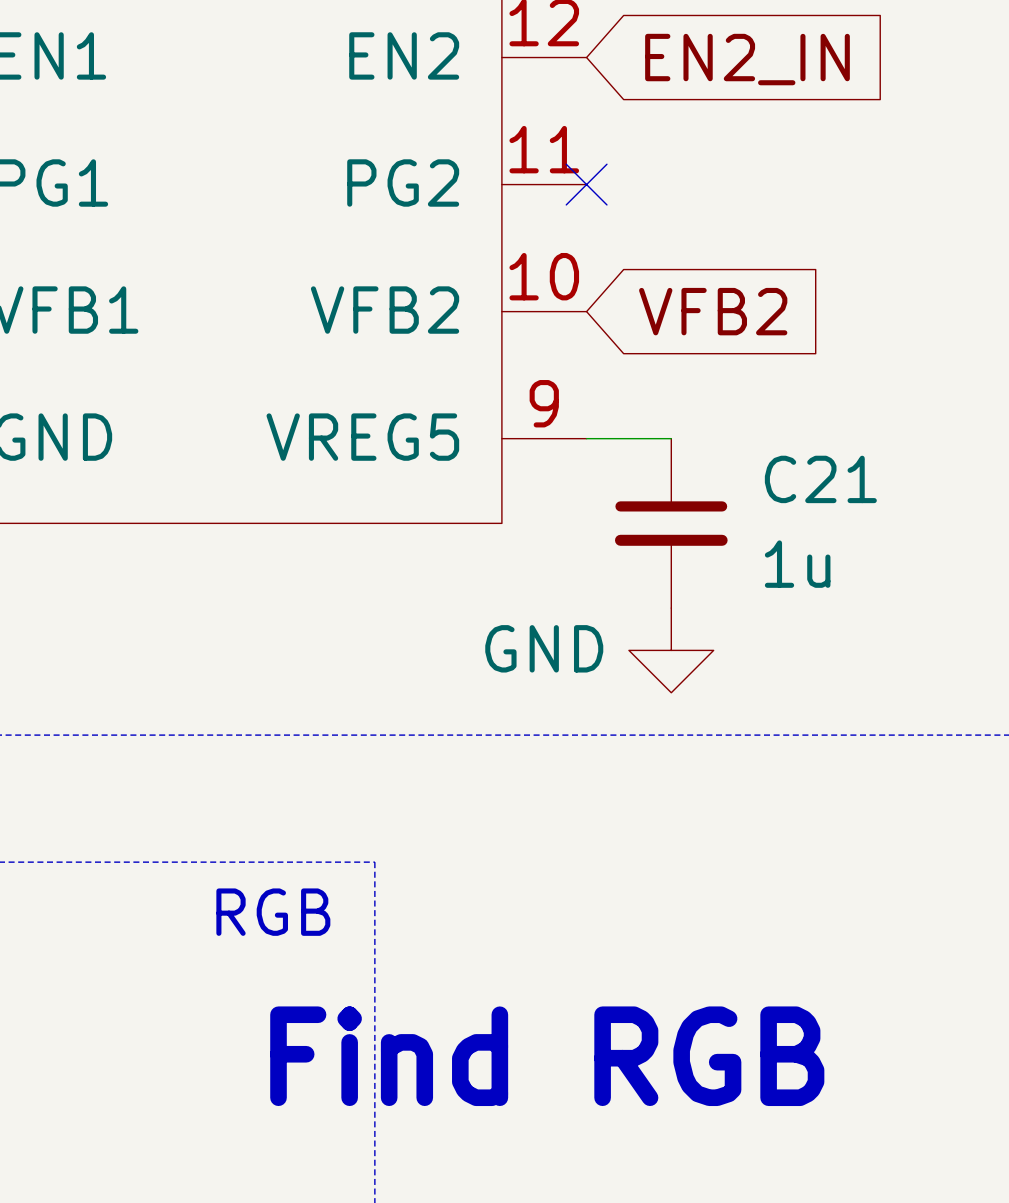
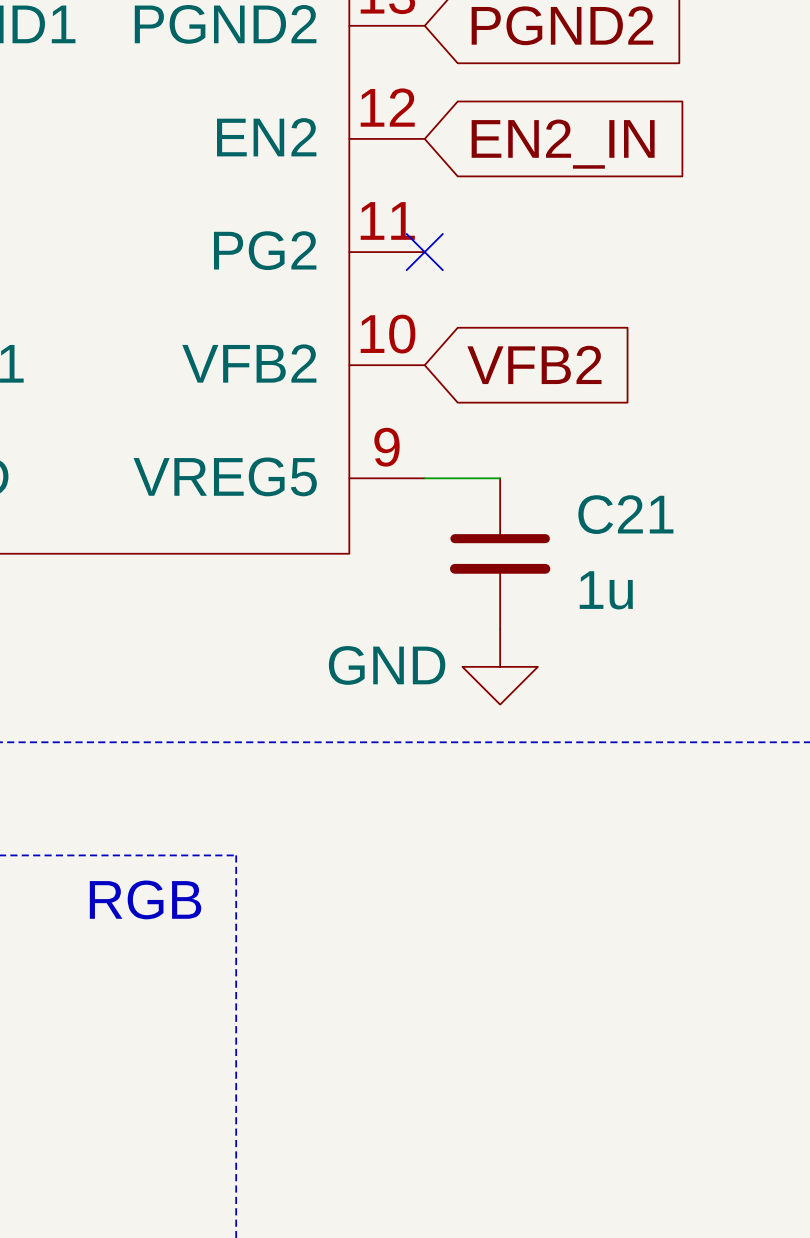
text: Find RGB (547, 1056) -> none

